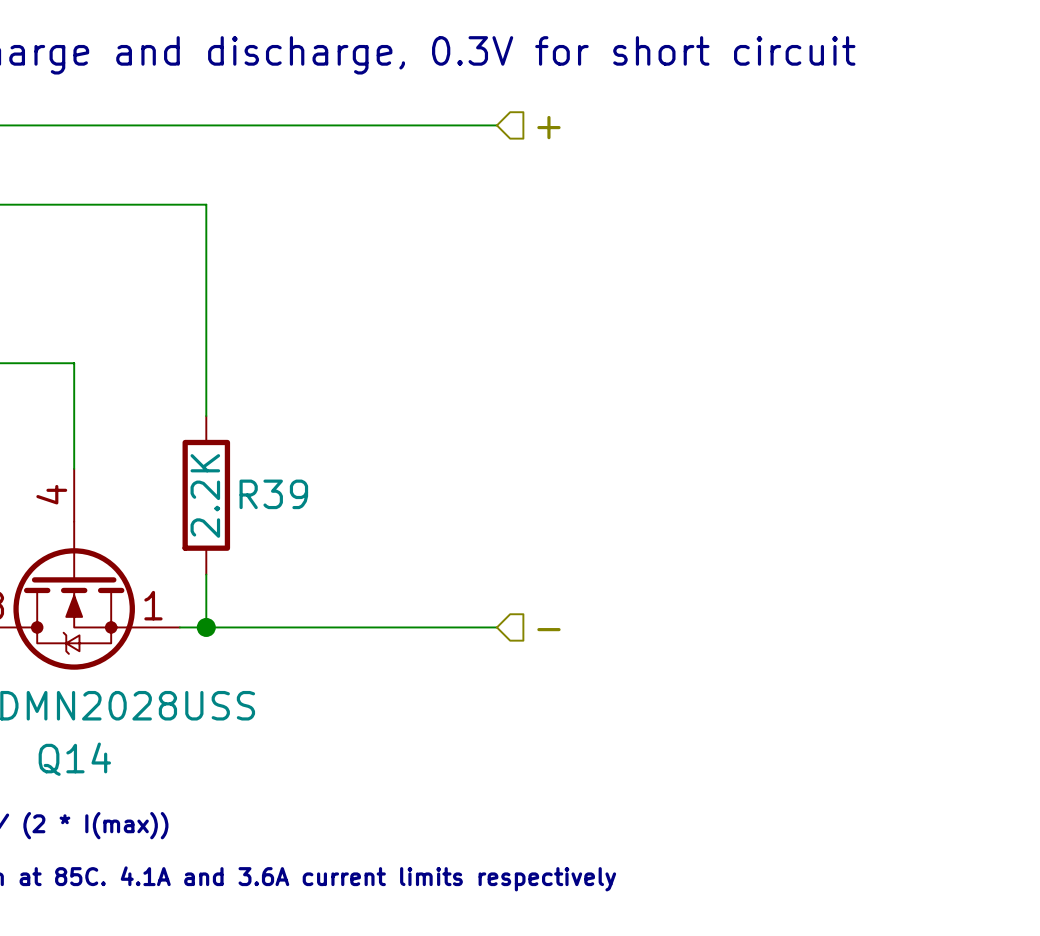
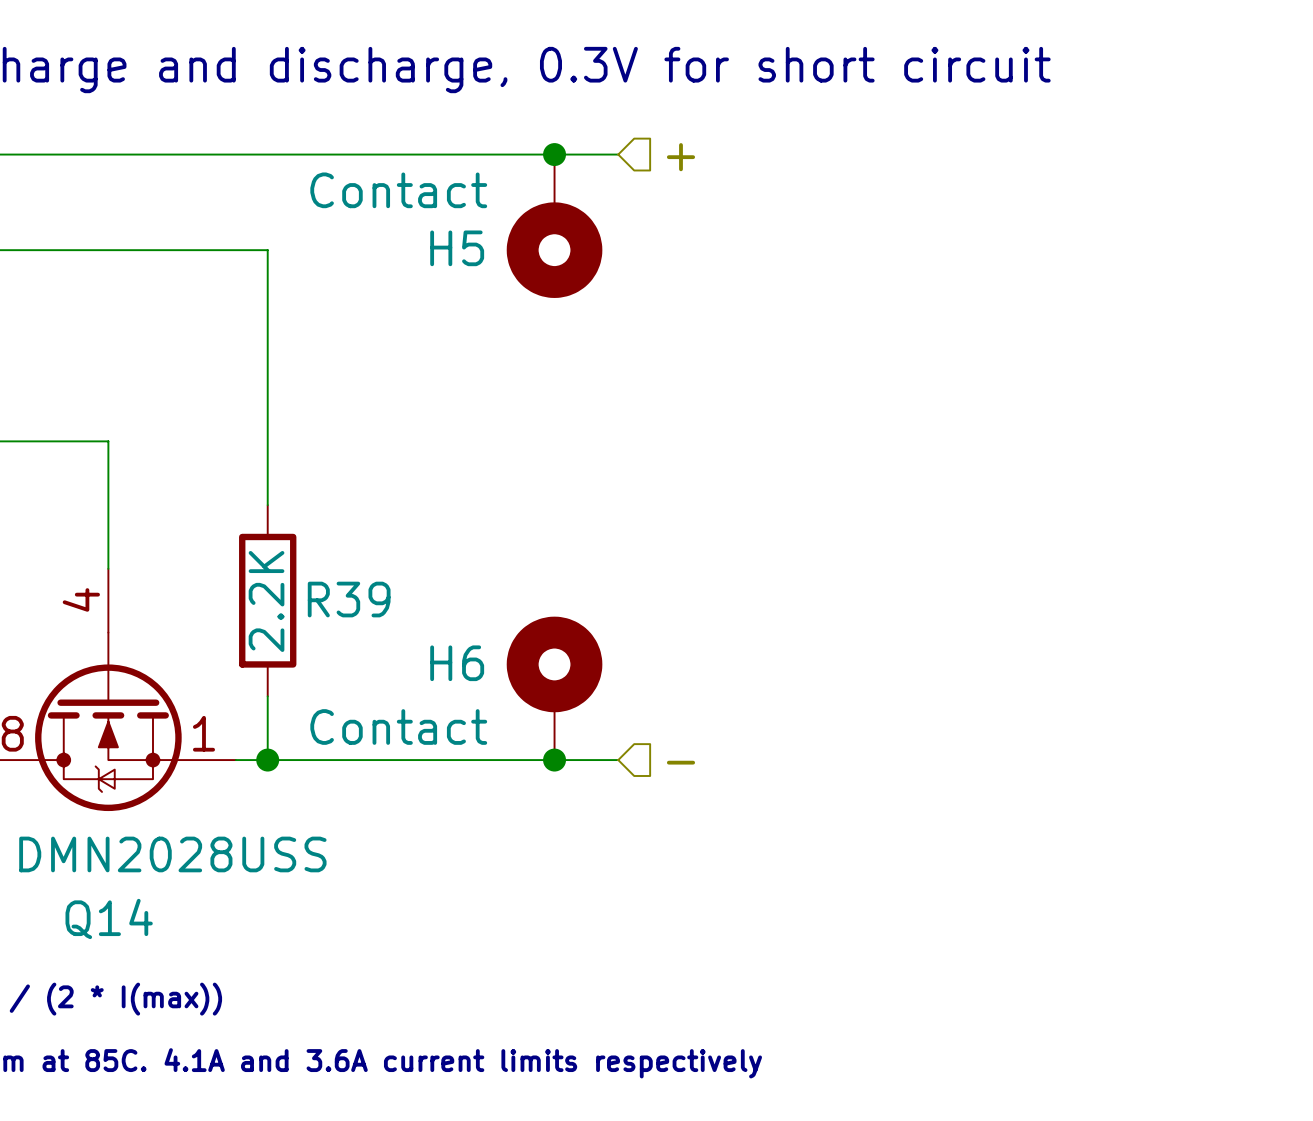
junction: none -> (554, 154)
H5: none -> Contact (554, 226)
H6: none -> Contact (554, 688)
junction: none -> (554, 760)

